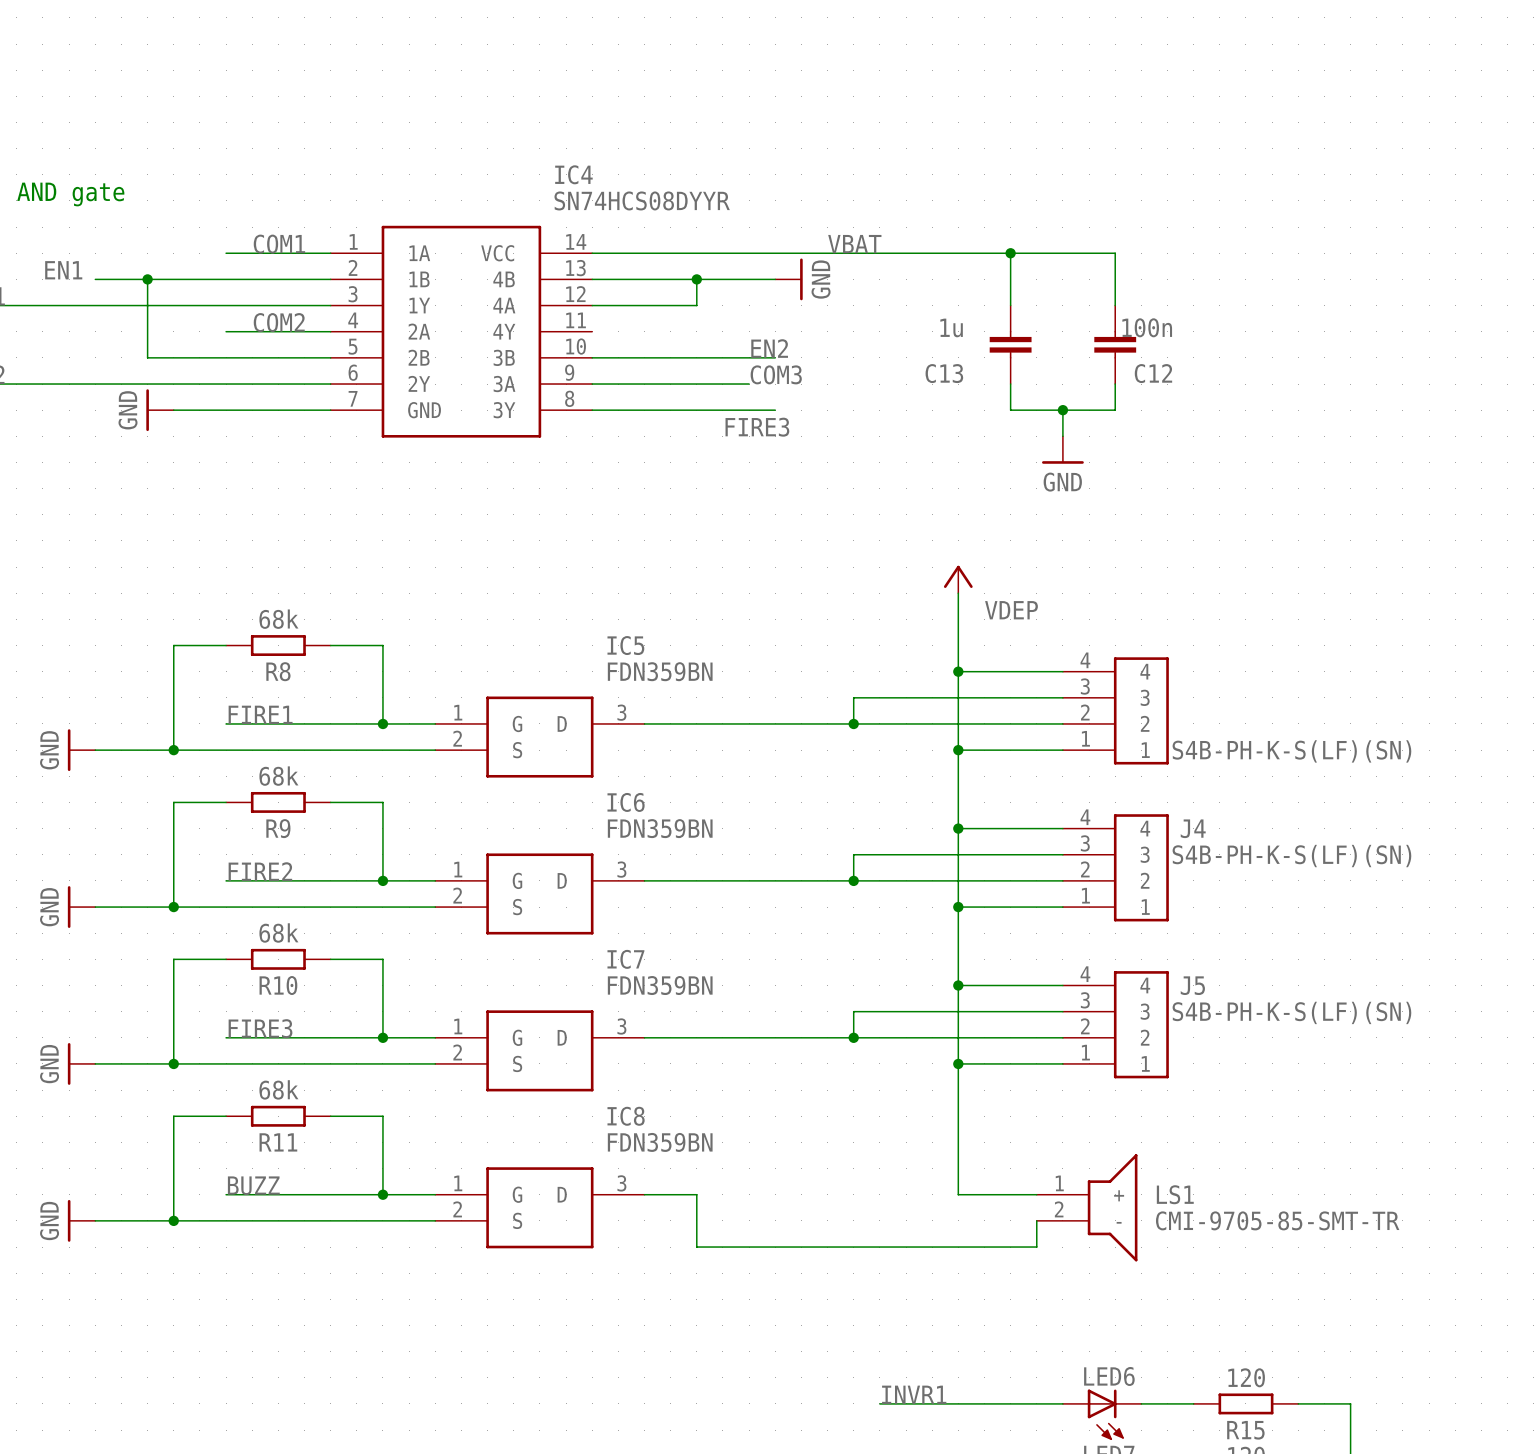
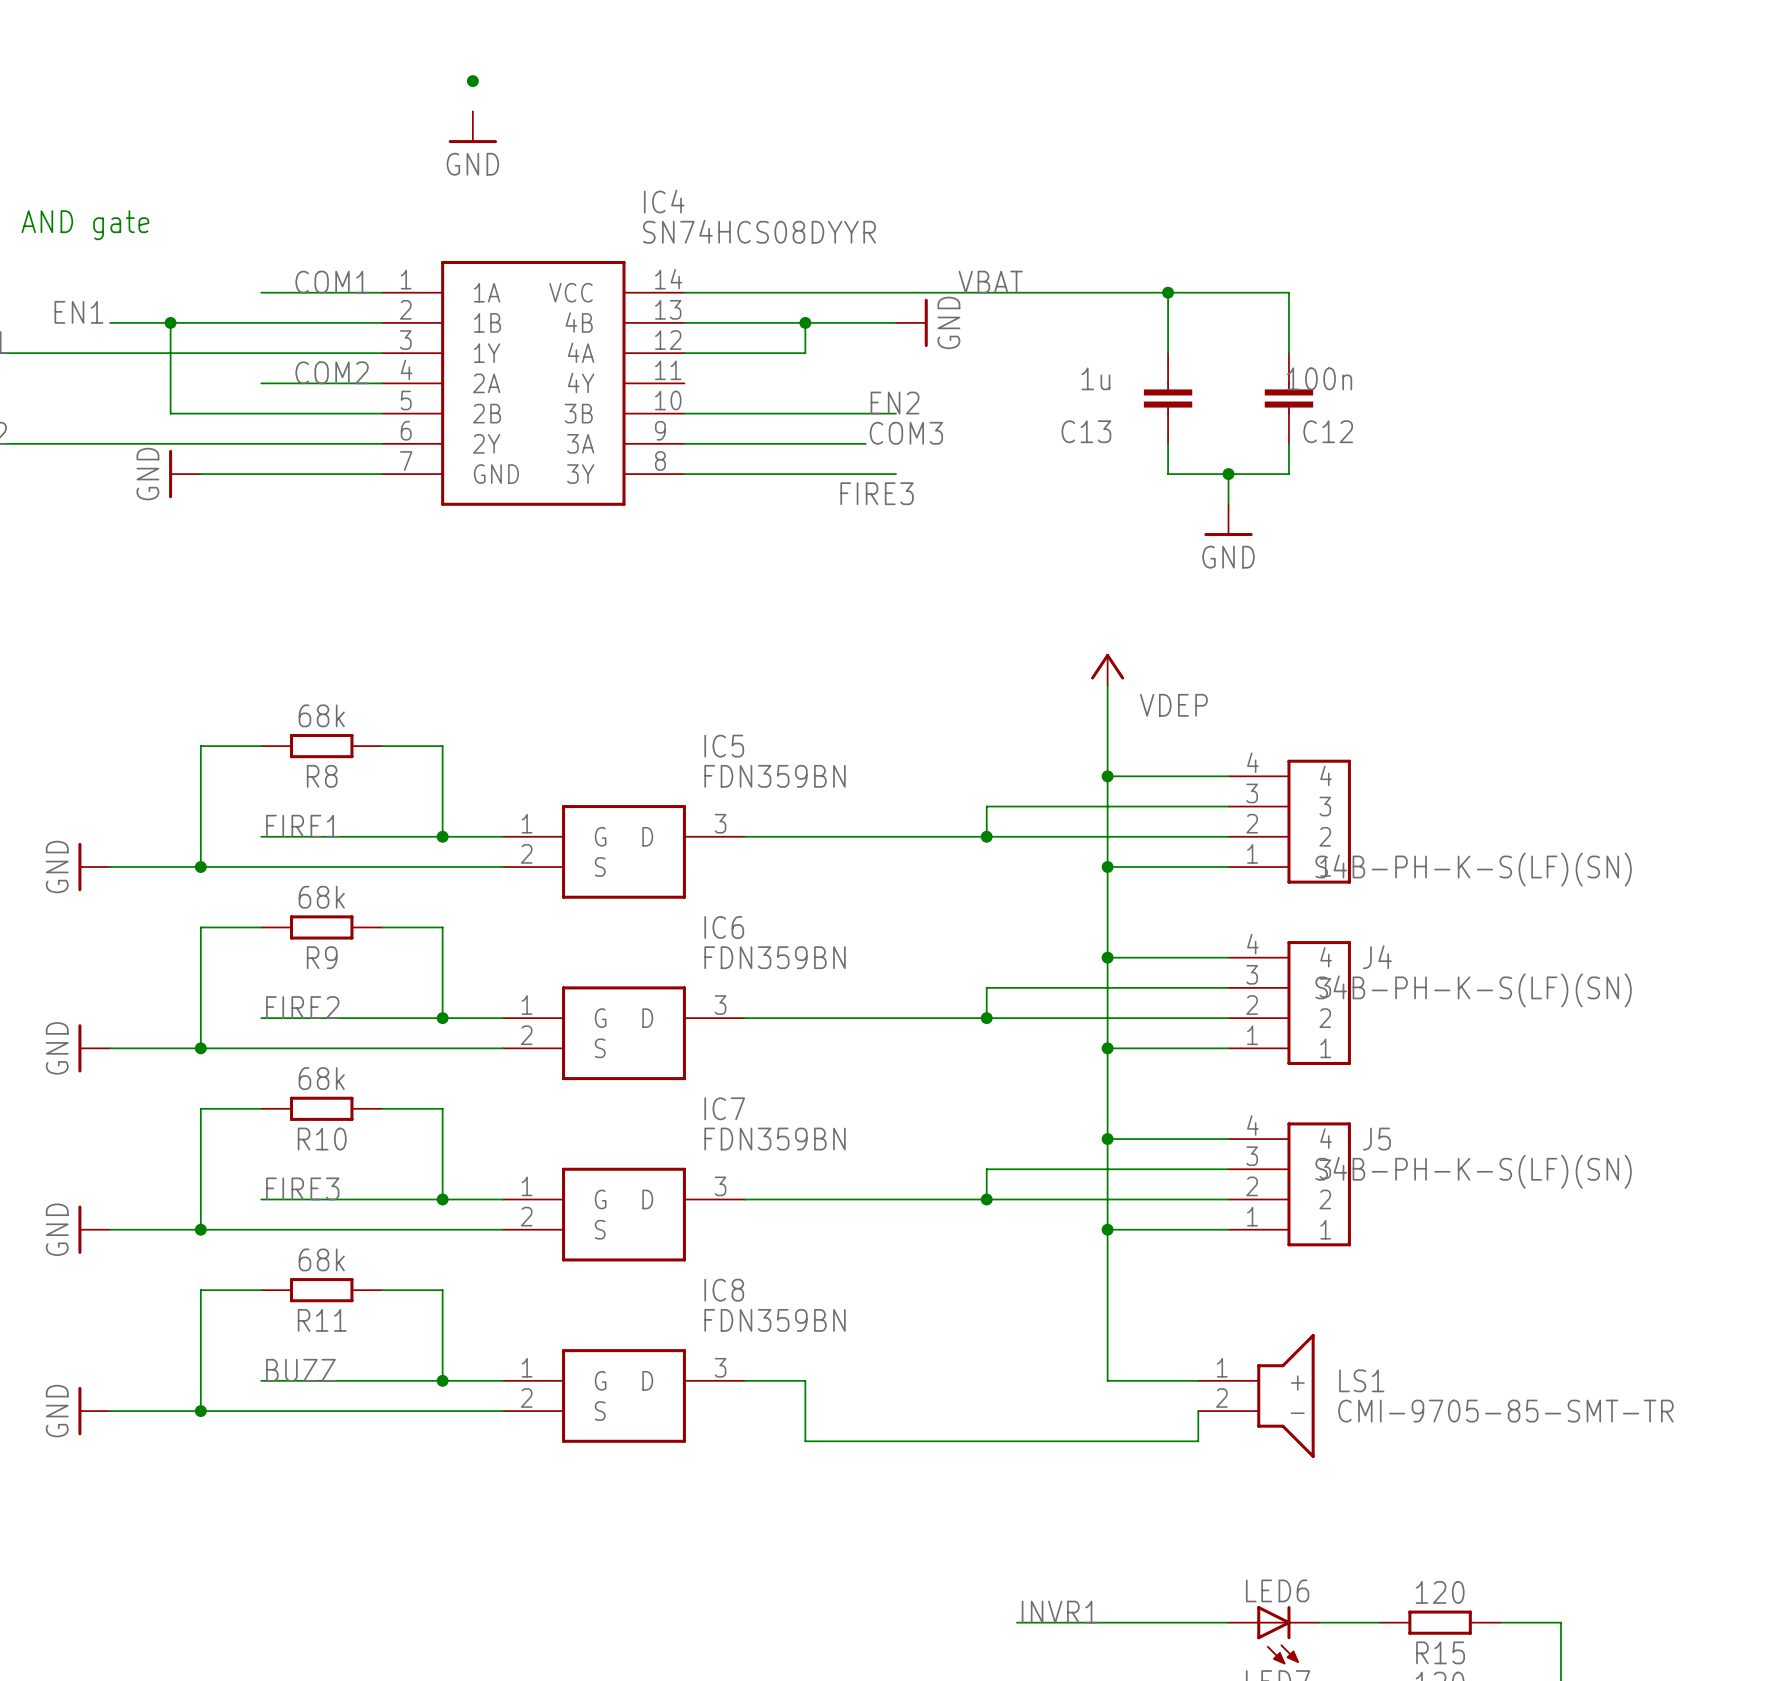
junction: none -> (472, 81)
power symbol: none -> GND (472, 127)

